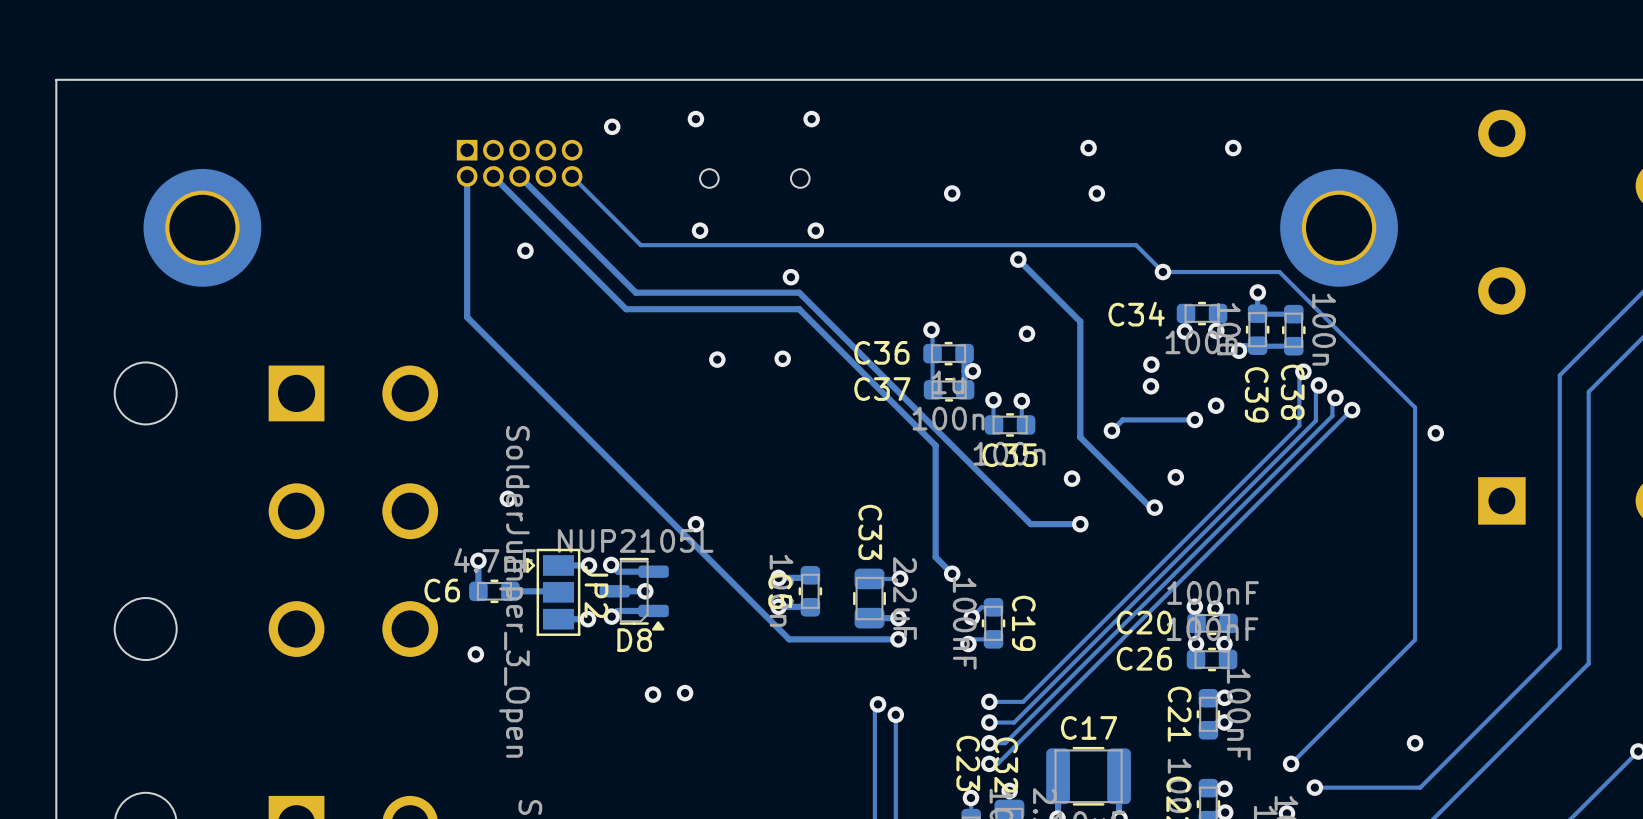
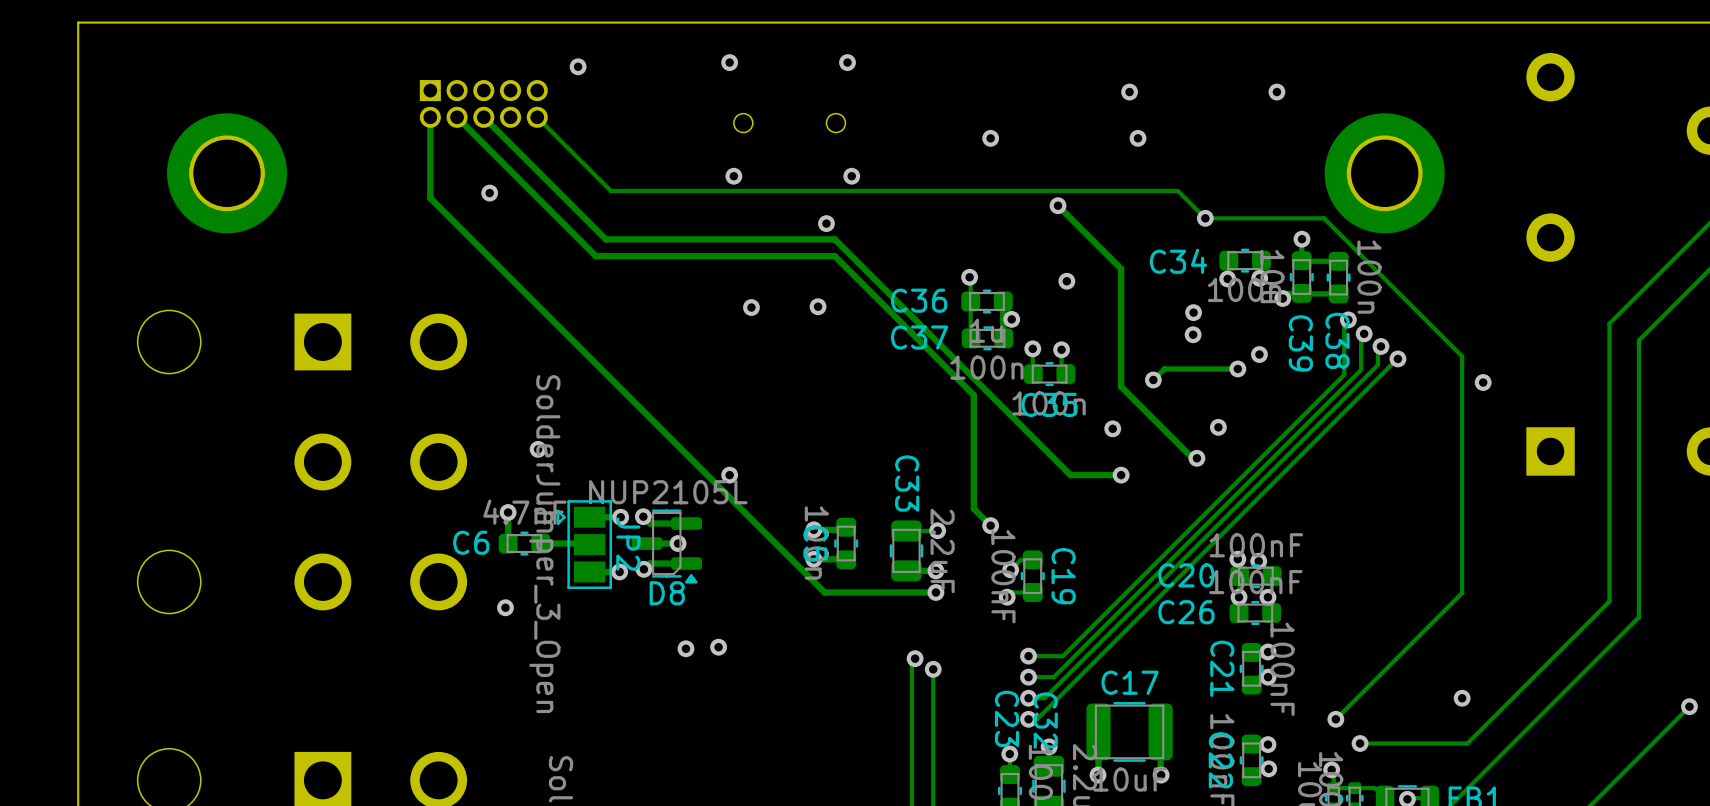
via: none -> (578, 66)
via: (612, 126) -> none
part position: (519, 163) -> (483, 103)
track: (467, 176) (467, 317) -> (430, 117) (430, 198) (496, 264)
track: (493, 176) (626, 309) -> (457, 117) (595, 256) (658, 256)
track: (519, 176) (635, 292) -> (483, 117) (605, 239) (668, 239)
track: (572, 176) (640, 245) -> (537, 117) (610, 190) (673, 190)
via: none -> (489, 193)
via: (525, 250) -> none

